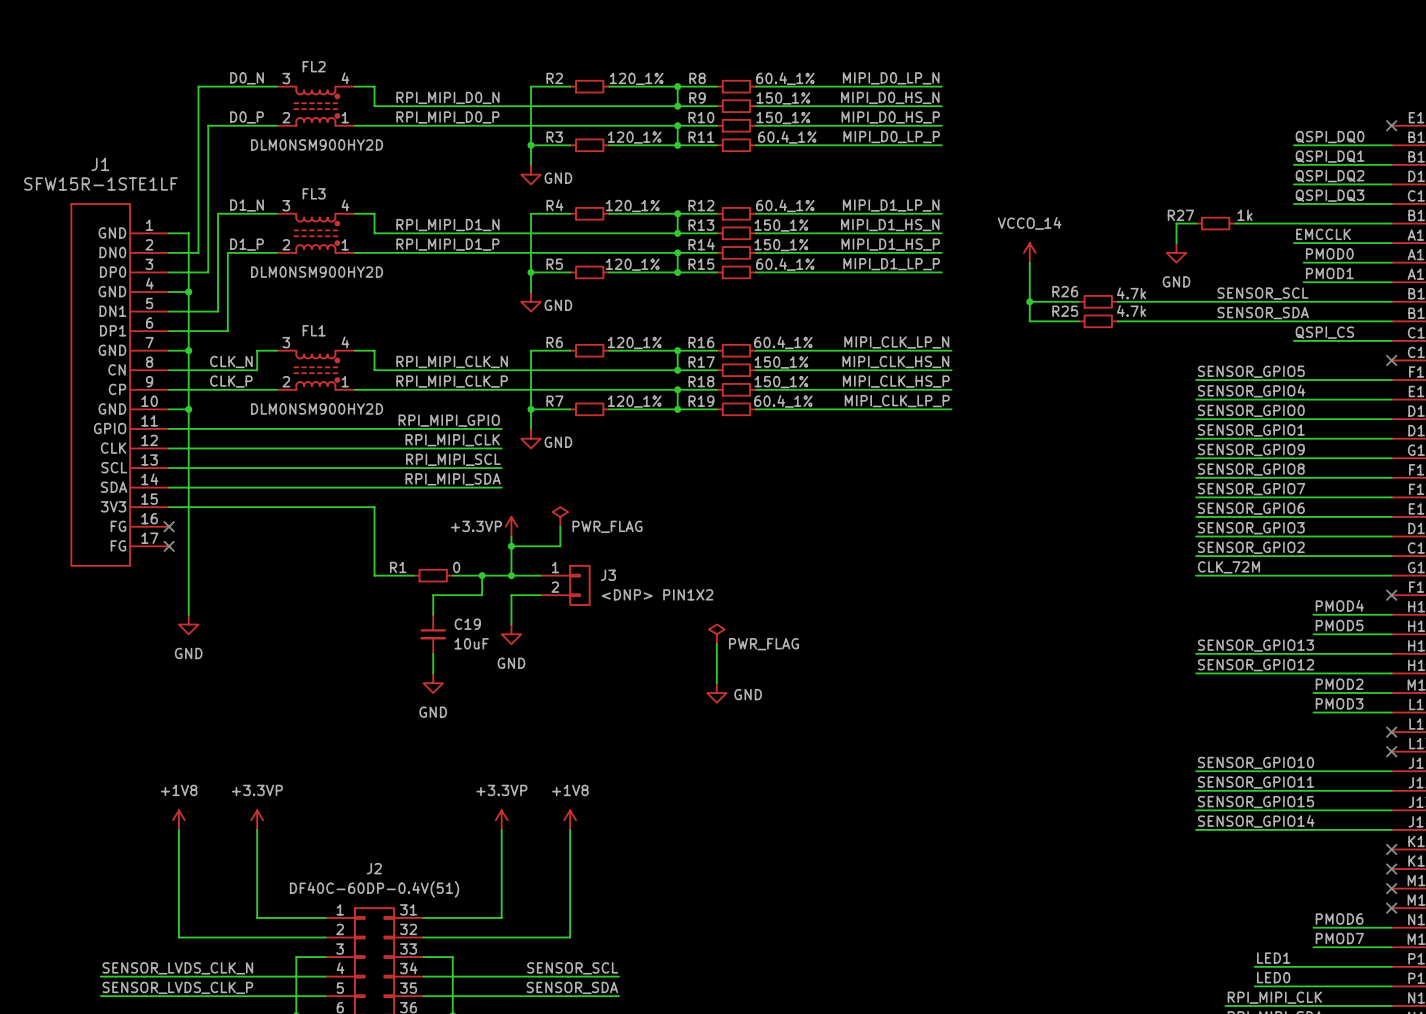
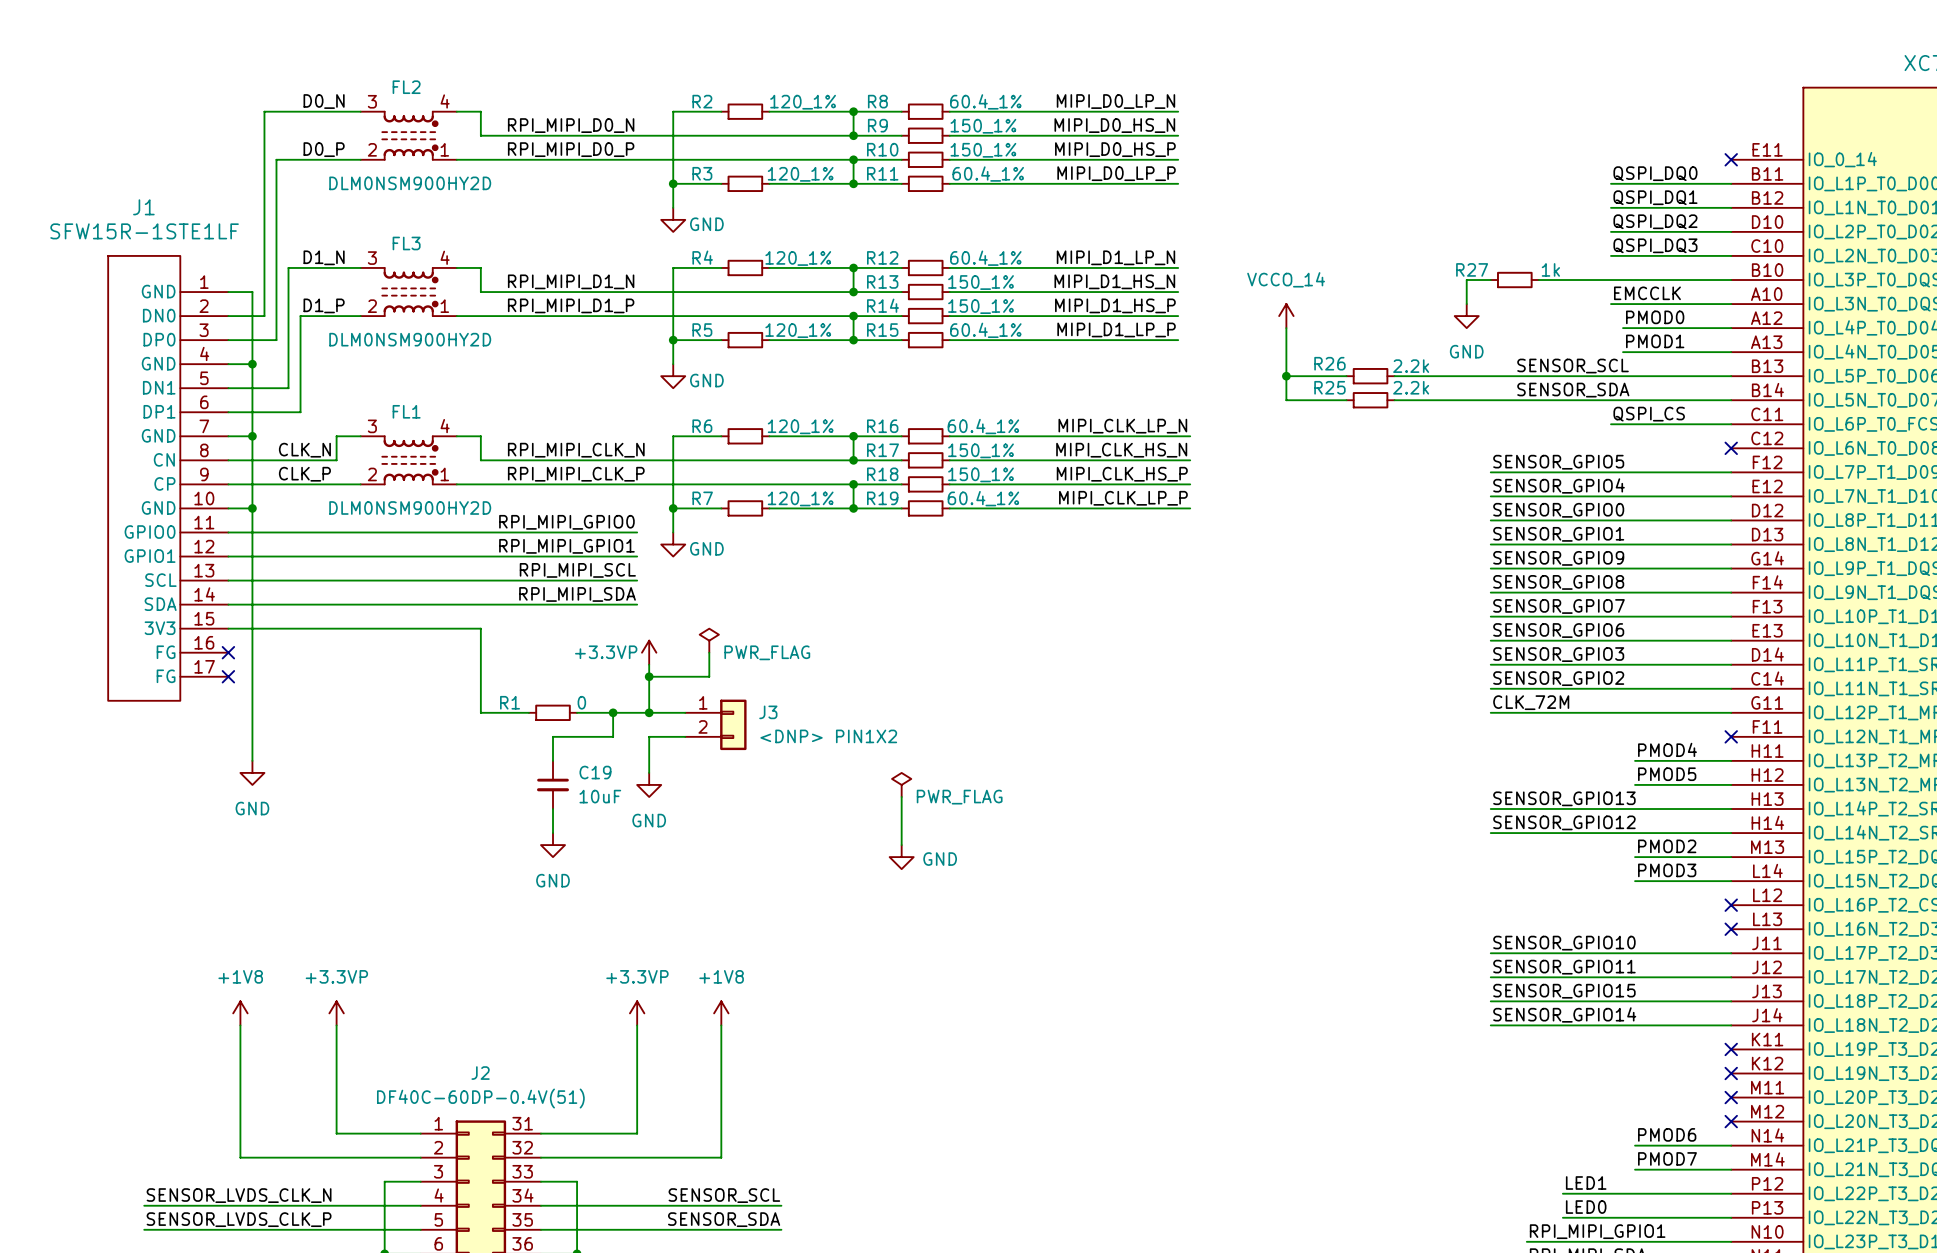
R26 value: 4.7k (1131, 293) -> 2.2k (1411, 366)
R25 value: 4.7k (1131, 310) -> 2.2k (1411, 387)
label: RPI_MIPI_GPIO (449, 420) -> RPI_MIPI_GPIO0 (566, 522)
J1 pin name: GPIO (110, 428) -> GPIO0 (150, 532)
label: RPI_MIPI_CLK (452, 440) -> RPI_MIPI_GPIO1 (566, 546)
J1 pin name: CLK (113, 448) -> GPIO1 (150, 556)
label: RPI_MIPI_CLK (1274, 997) -> RPI_MIPI_GPIO1 (1597, 1231)

